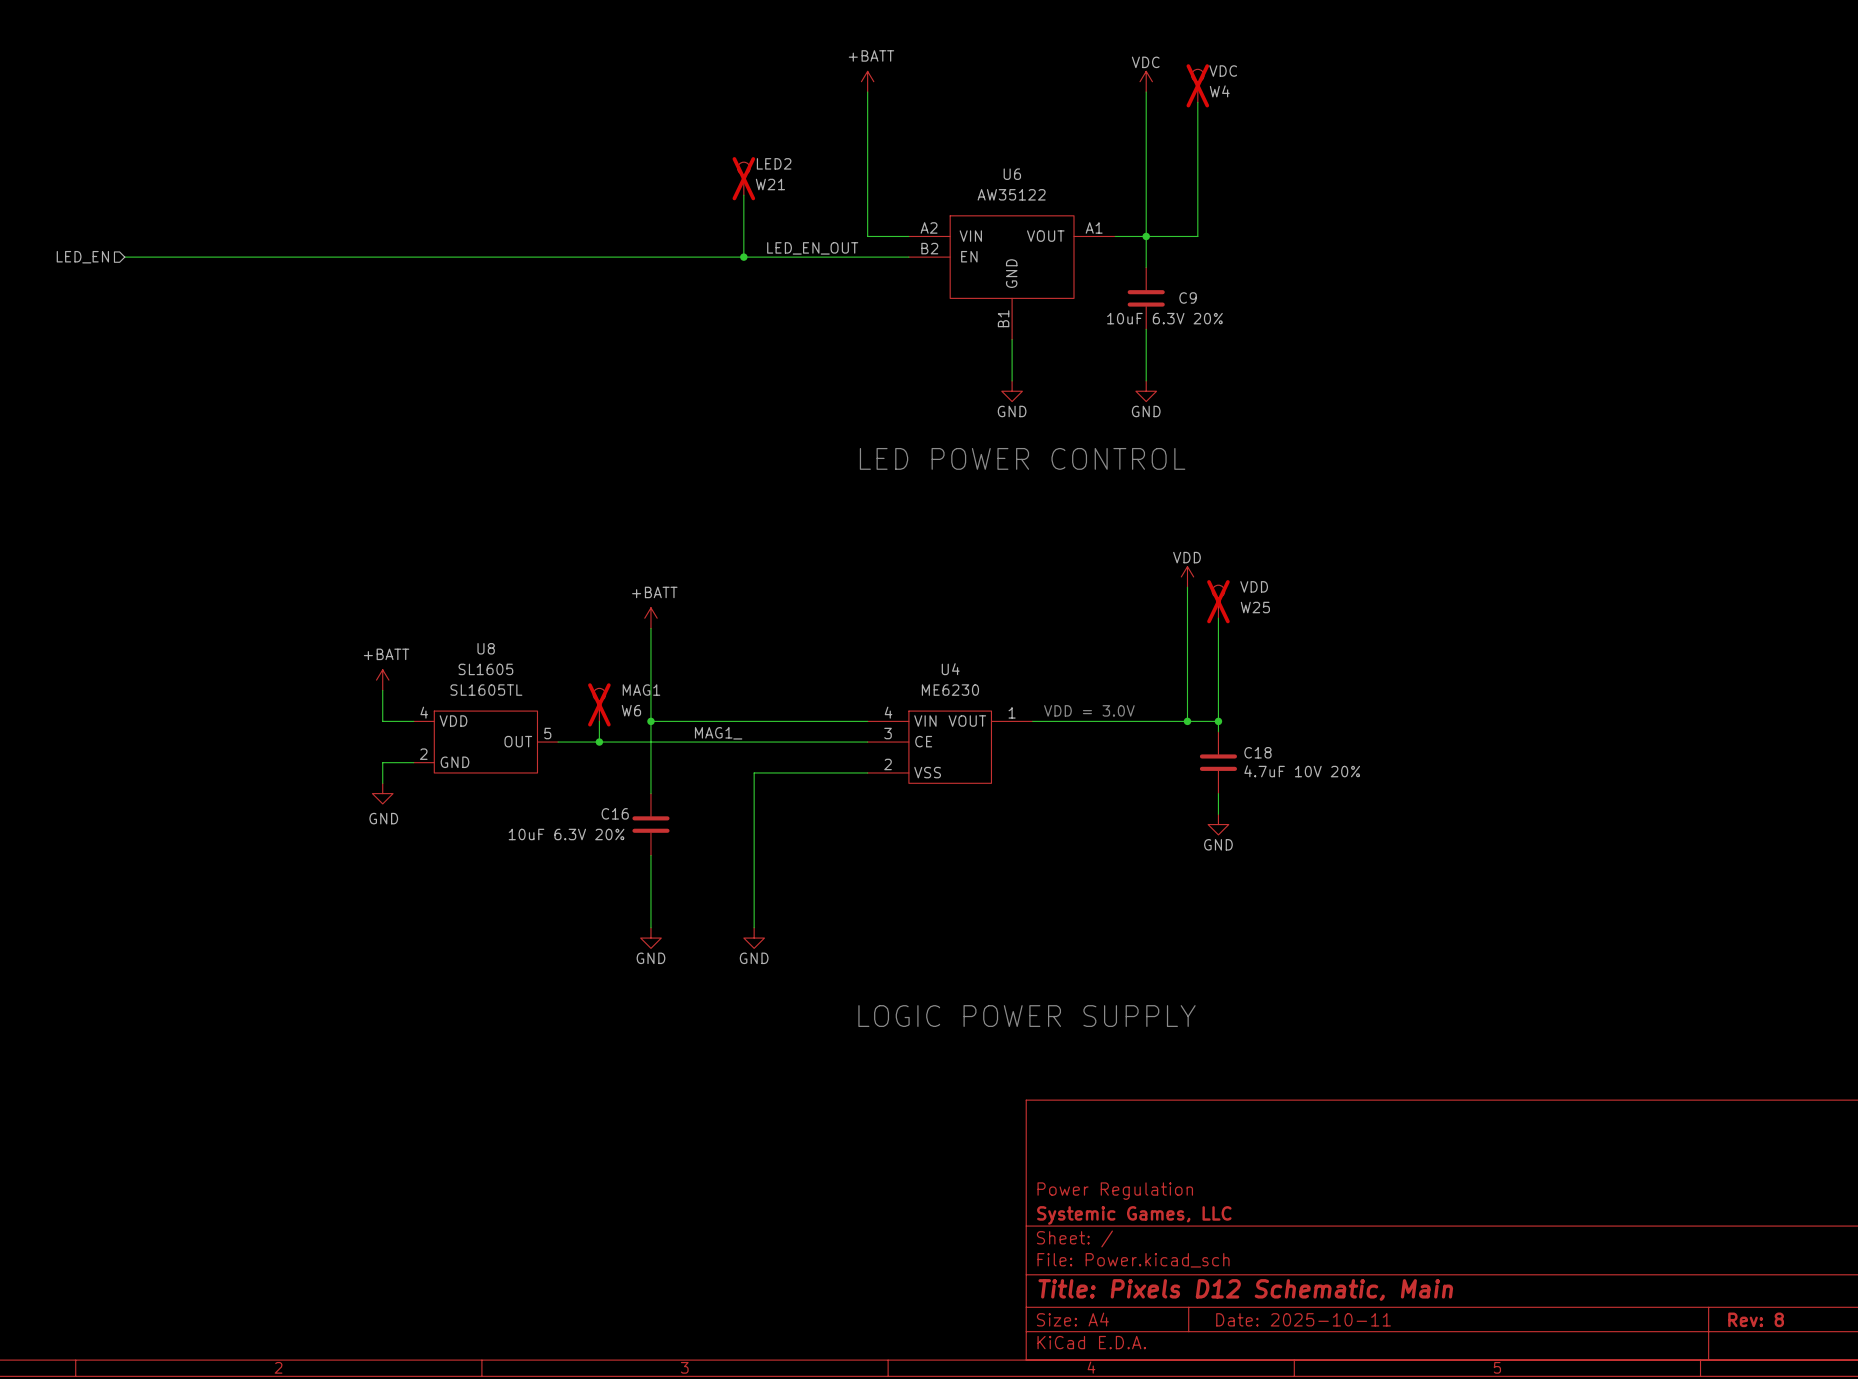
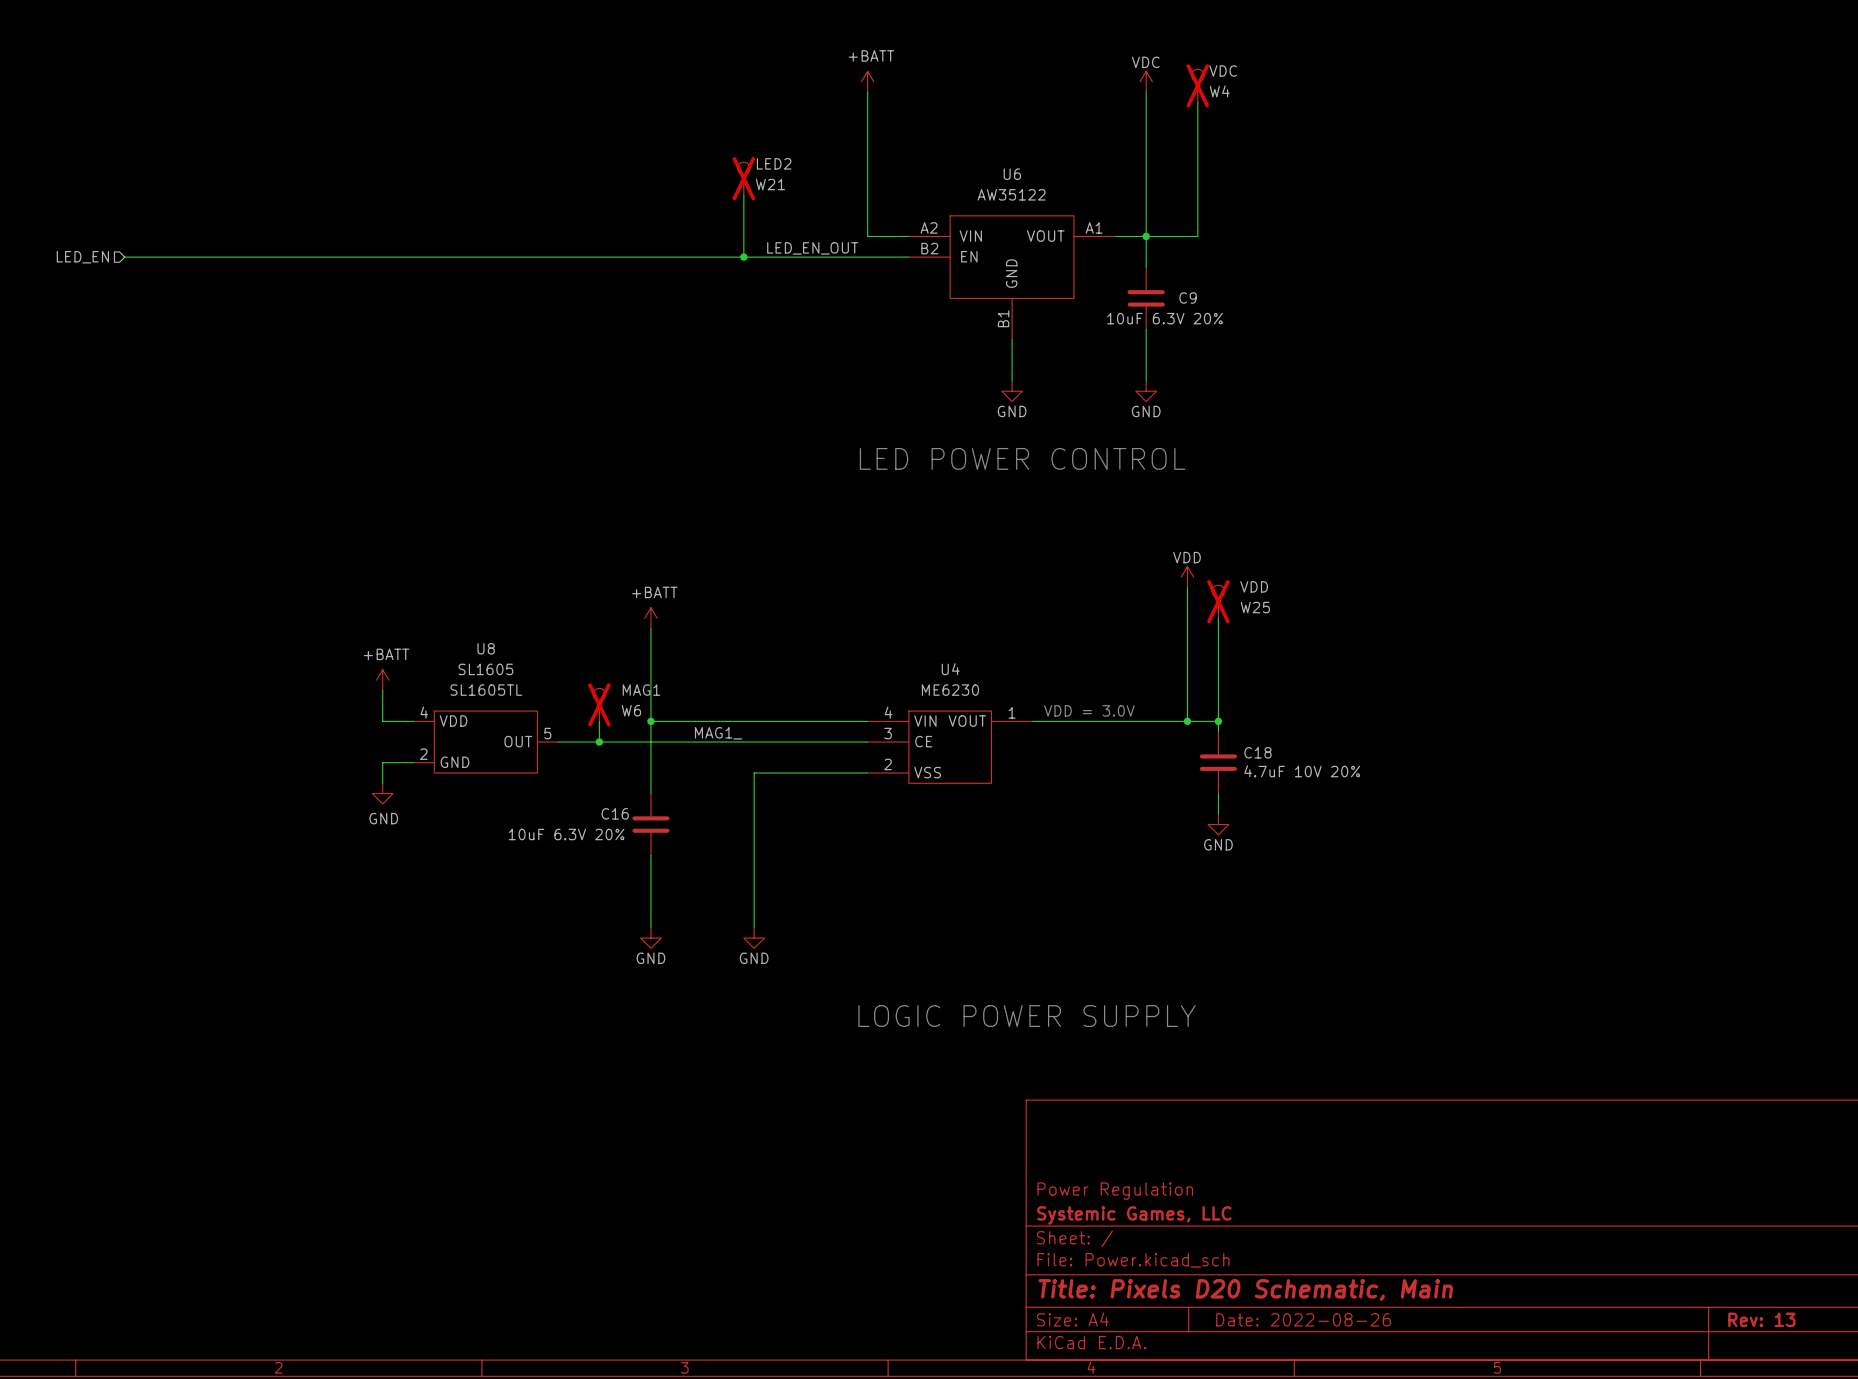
title block: Title: Pixels D12 Schematic, Main (1245, 1289) -> Title: Pixels D20 Schematic, Main (1245, 1289)
title block: Date: 2025-10-11 (1303, 1319) -> Date: 2022-08-26 (1303, 1319)
title block: Rev: 8 (1756, 1319) -> Rev: 13 (1761, 1319)

